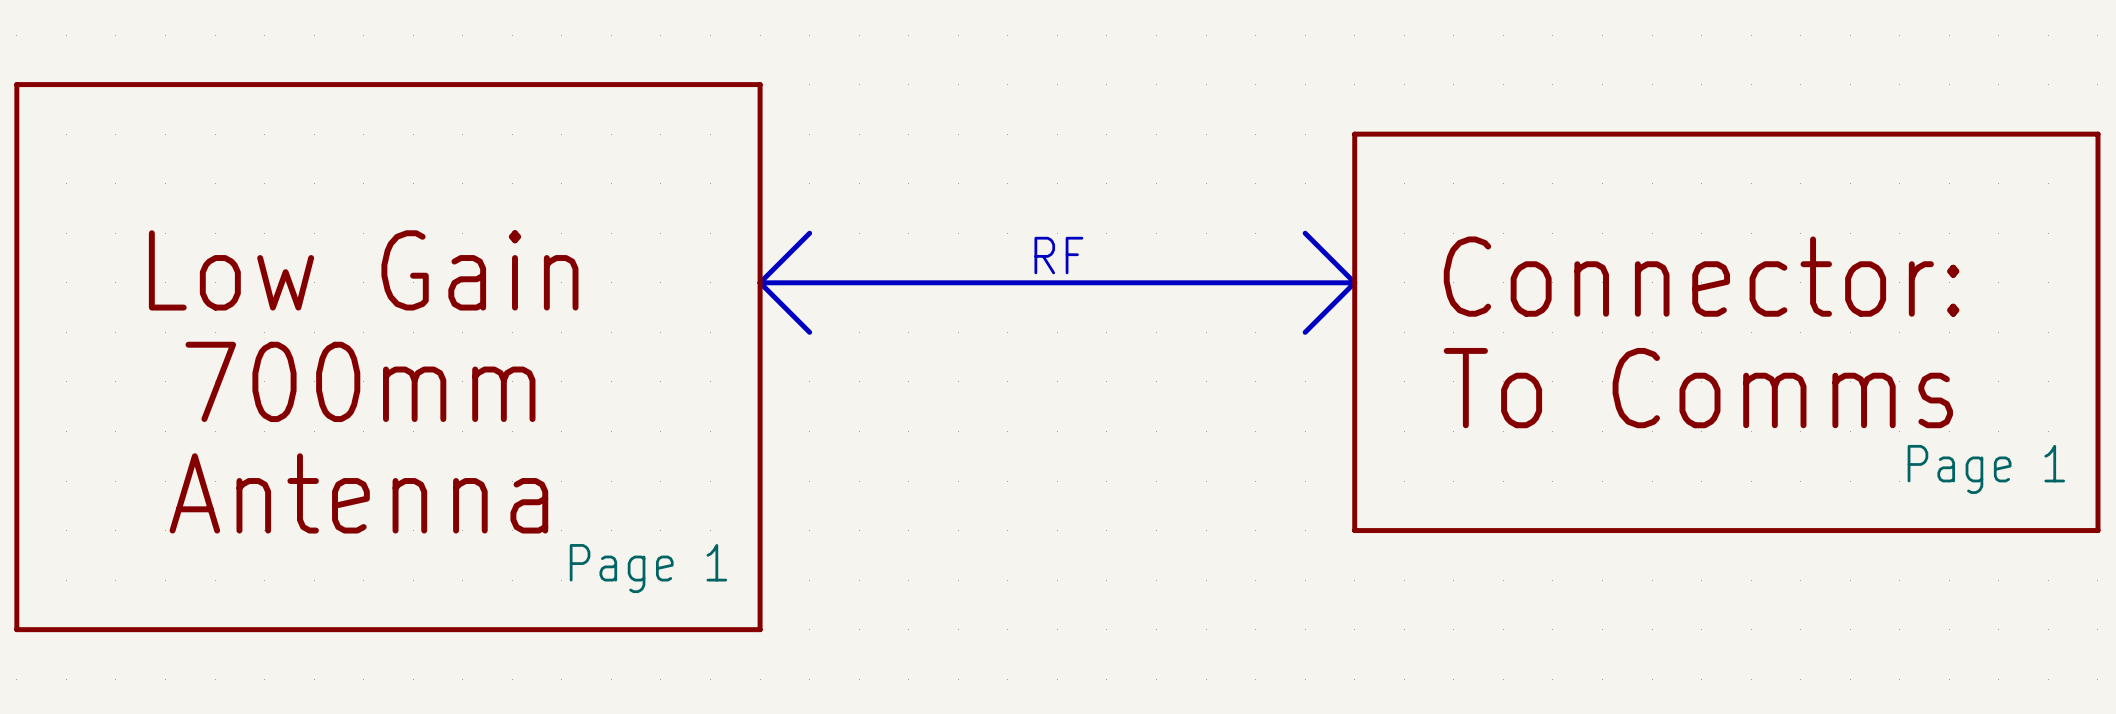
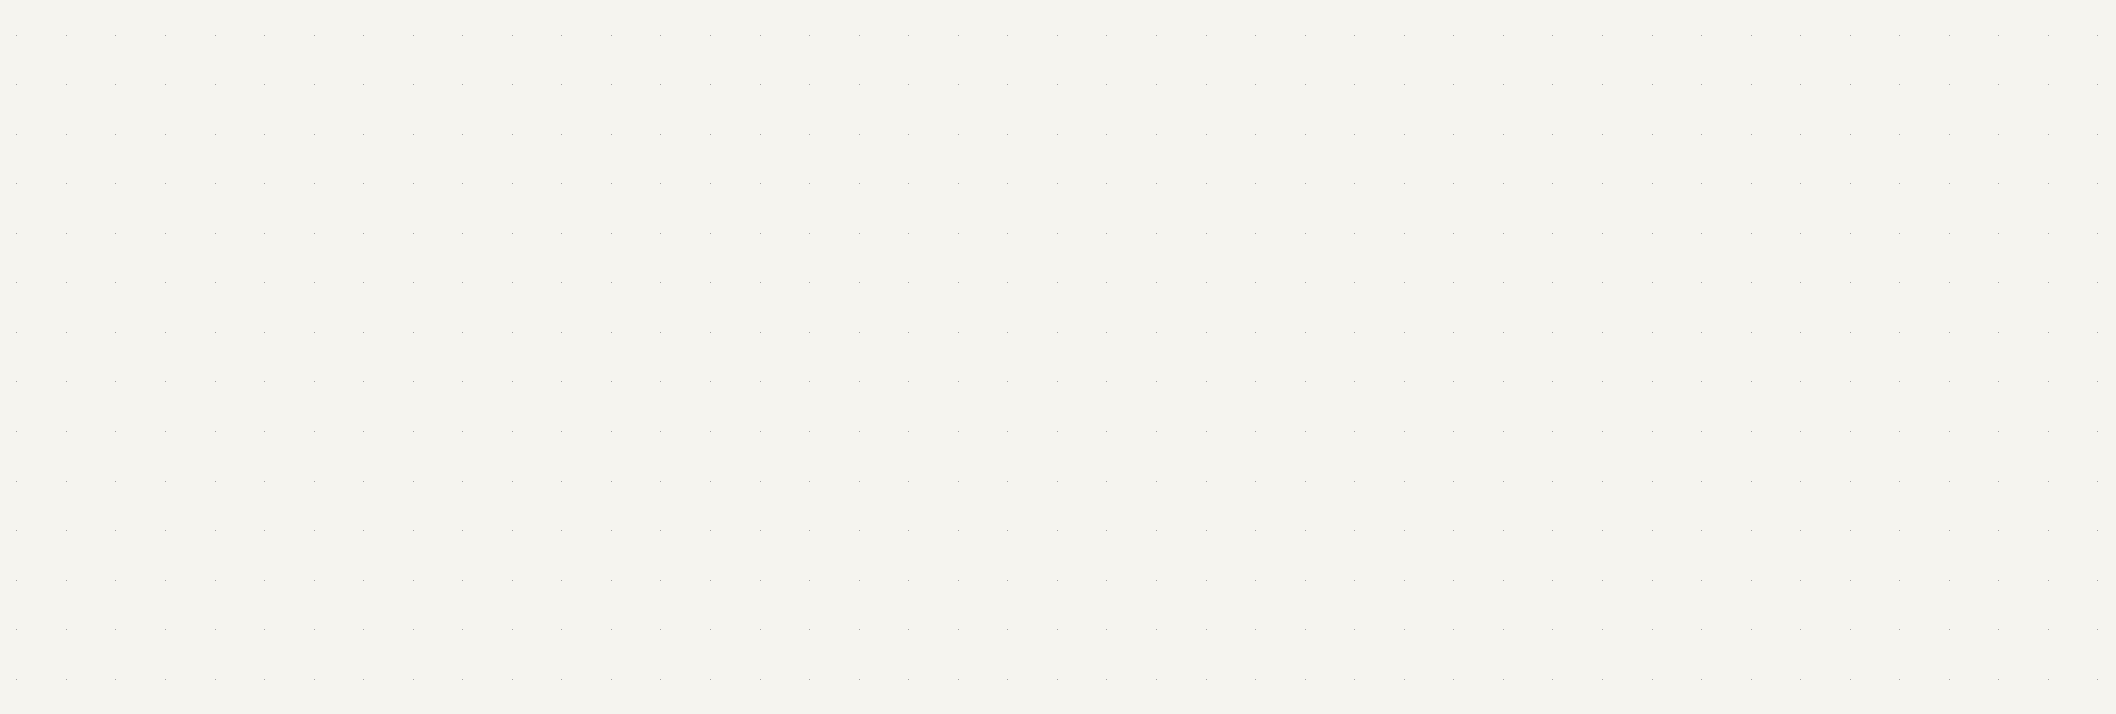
line: (16, 84) (16, 629) (760, 629) (760, 84) (16, 84) -> none
line: (1354, 134) (2097, 134) (2097, 530) (1354, 530) (1354, 134) -> none
line: (809, 233) (760, 282) -> none
line: (1305, 233) (1354, 282) -> none
text: RF (1058, 255) -> none
text: Low Gain (363, 270) -> none
text: Connector: (1701, 276) -> none
line: (760, 282) (1354, 282) -> none
line: (760, 282) (809, 332) -> none
line: (1354, 282) (1305, 332) -> none
text: 700mm (360, 381) -> none
text: To Comms (1698, 388) -> none
text: Page 1 (1986, 469) -> none
text: Antenna (358, 493) -> none
text: Page 1 (648, 568) -> none

